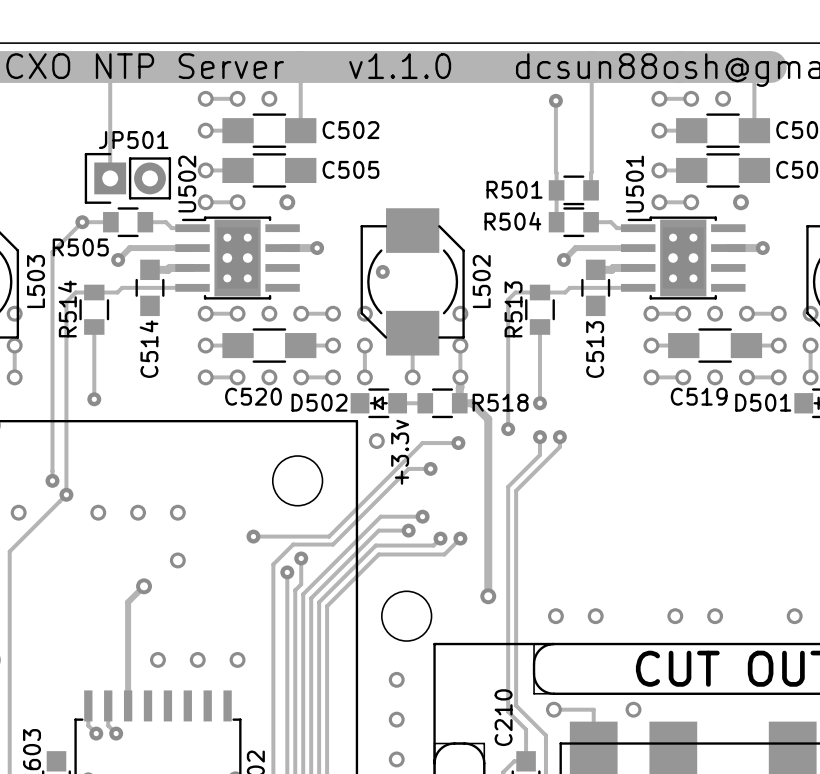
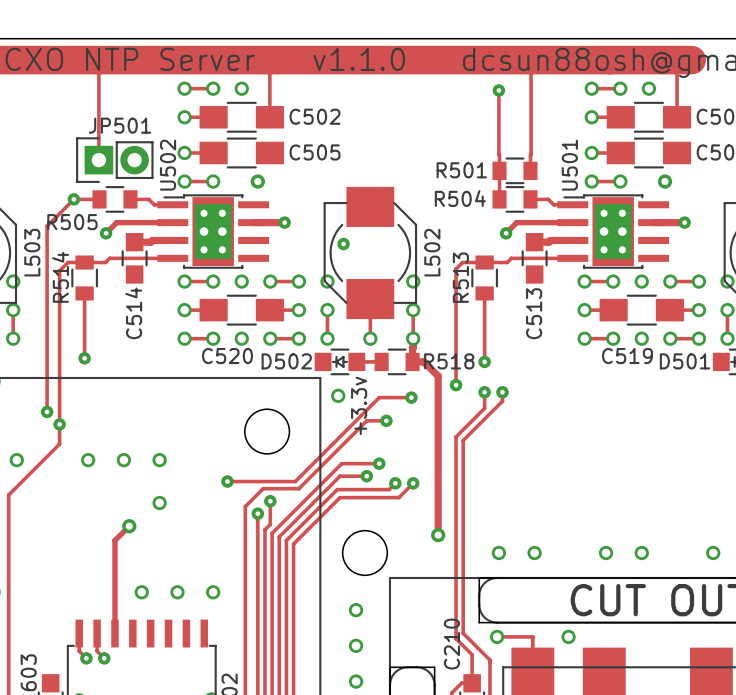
track: (52, 458) (52, 480) -> none
via: none -> (47, 411)
via: none -> (59, 424)
via: (52, 480) -> none
via: (66, 494) -> none

